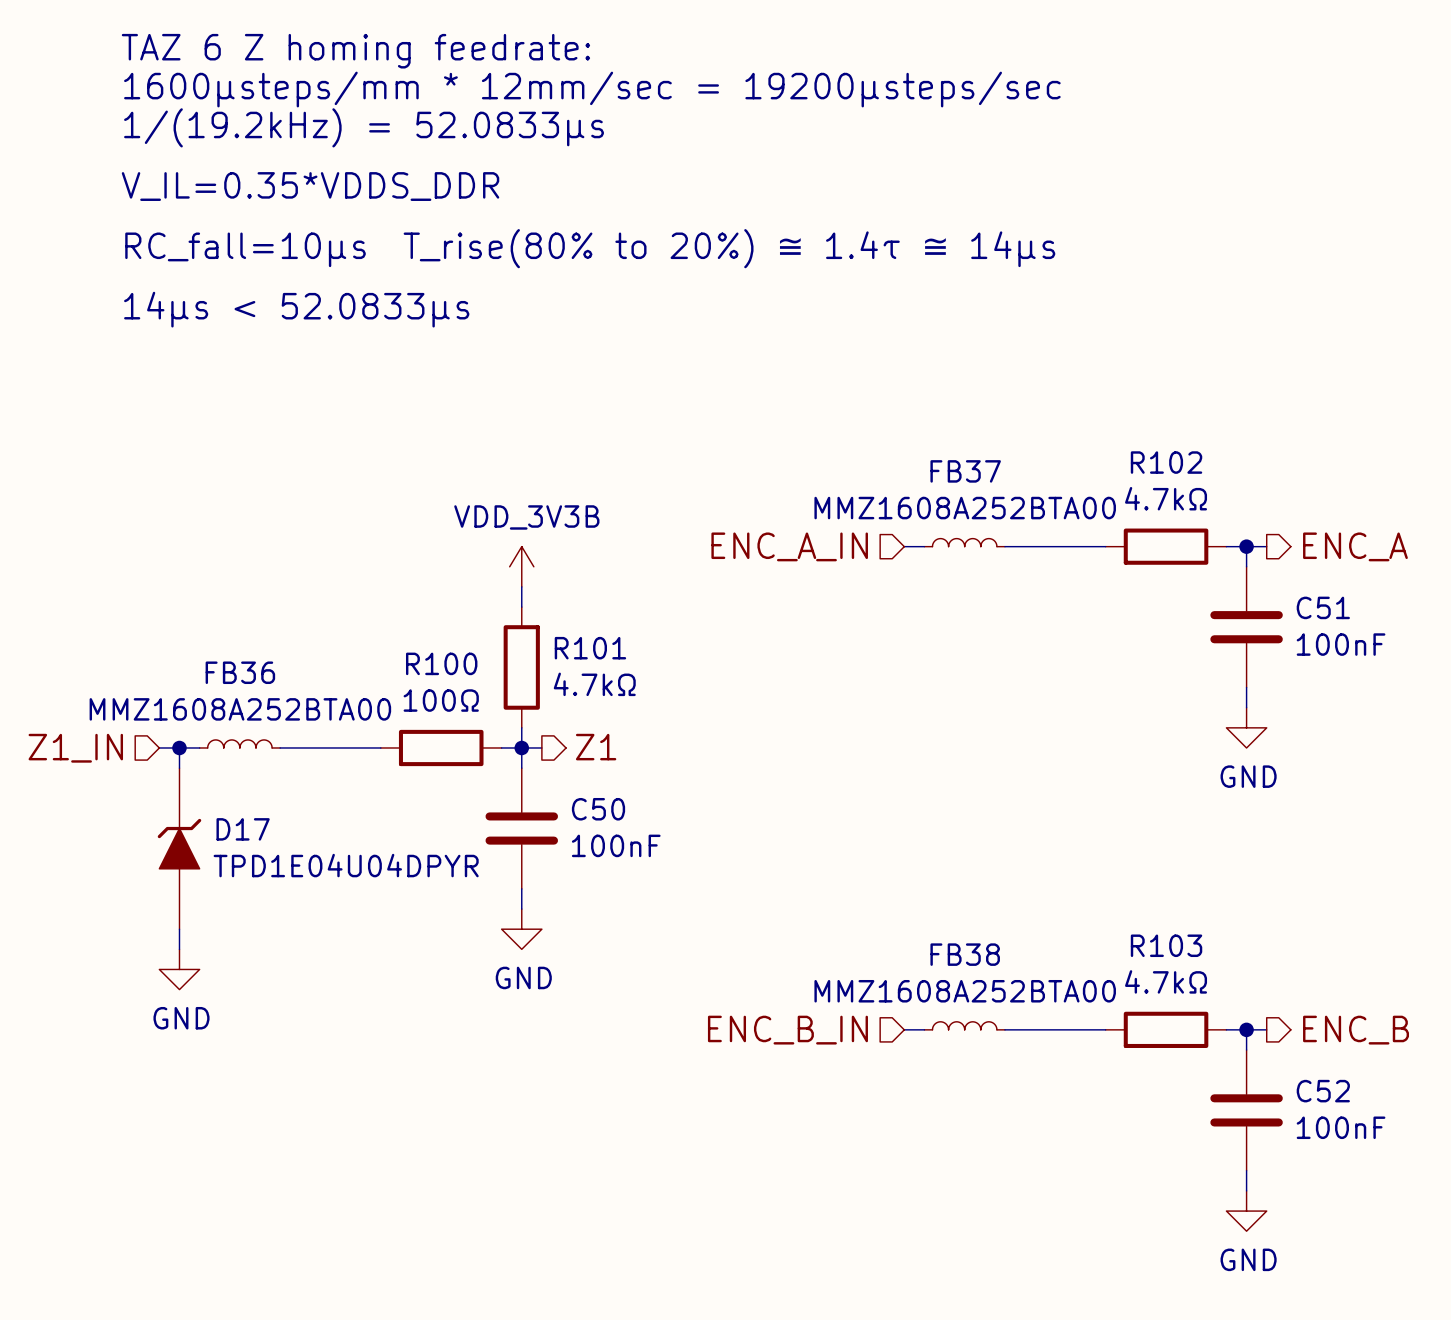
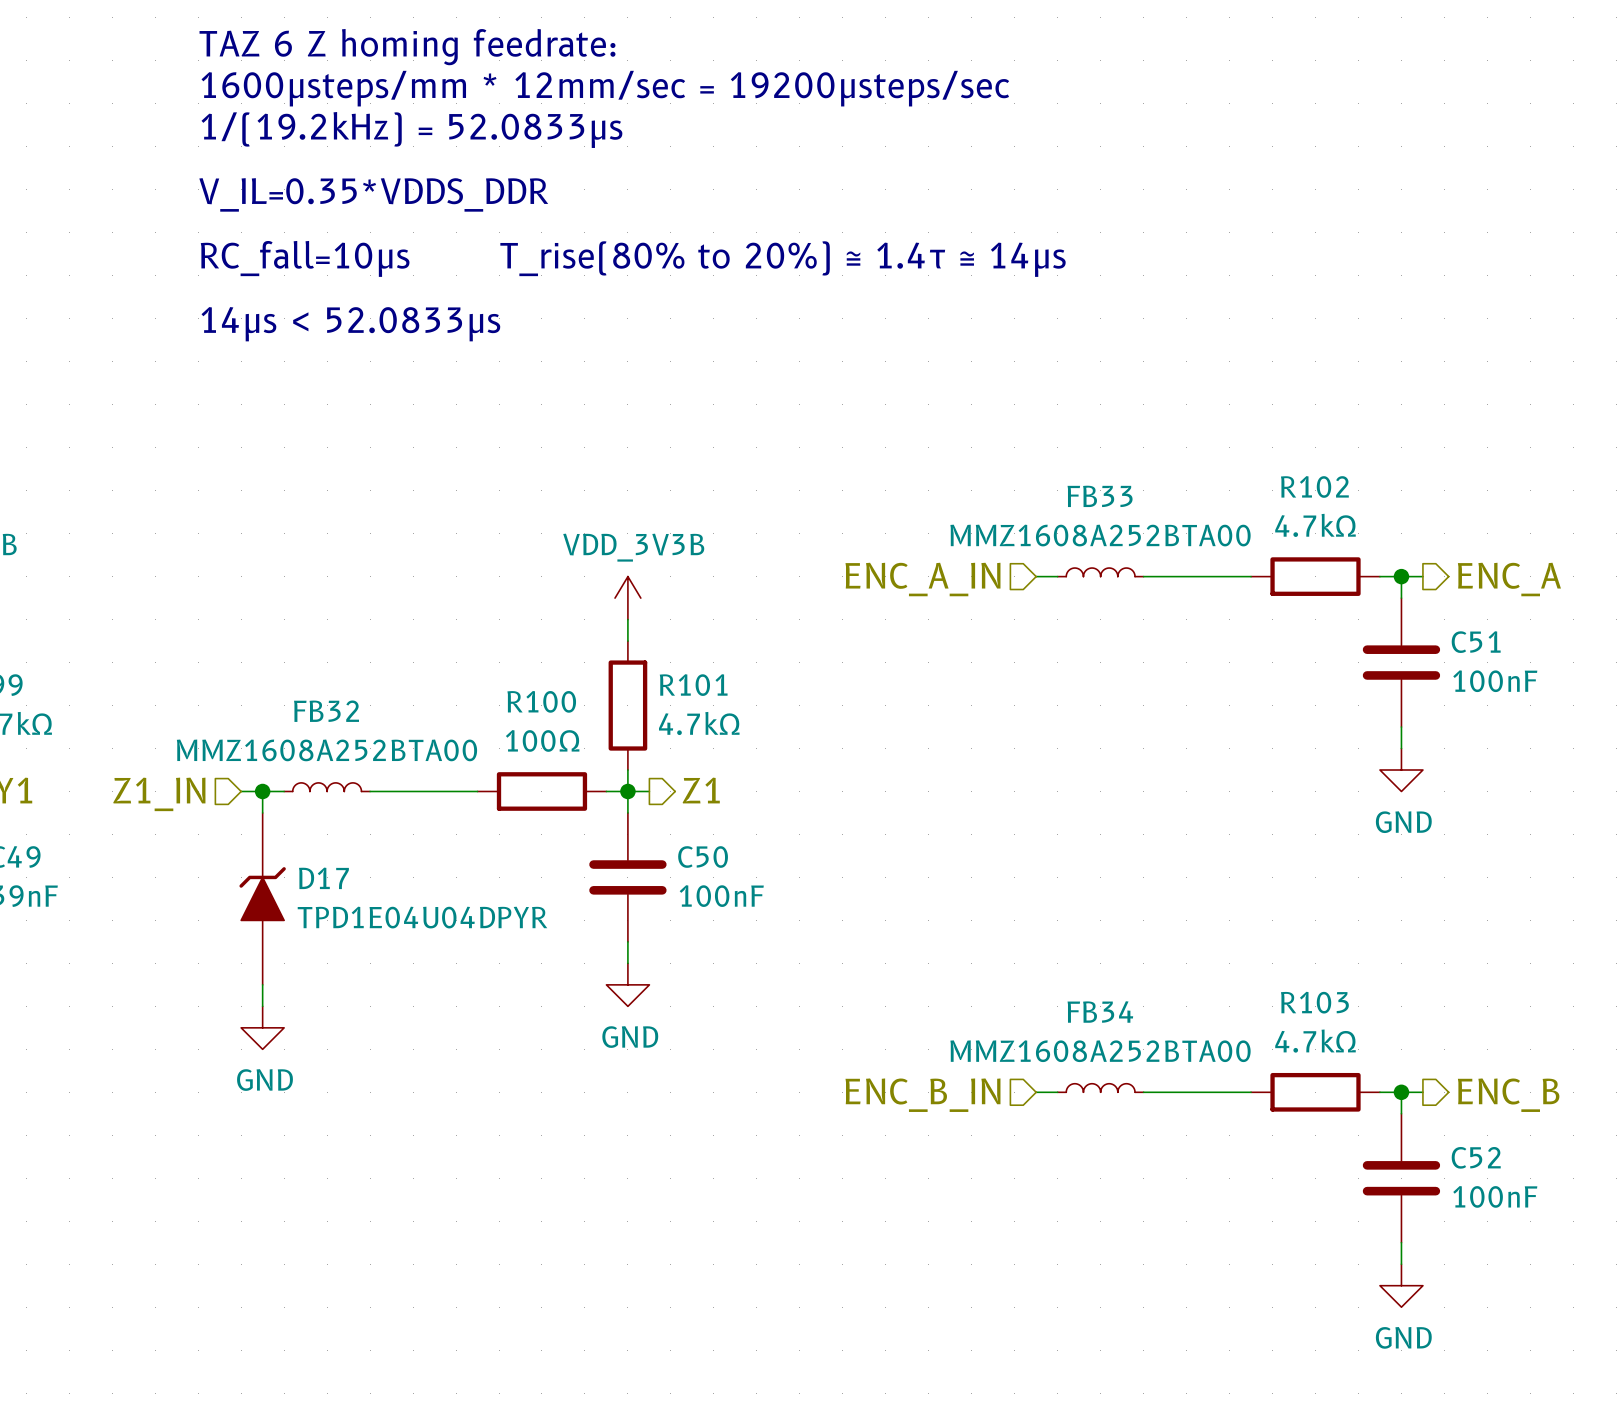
FB37 name: FB37 (965, 471) -> FB33 (1100, 496)
FB36 name: FB36 (240, 672) -> FB32 (326, 711)
FB38 name: FB38 (965, 954) -> FB34 (1100, 1012)

